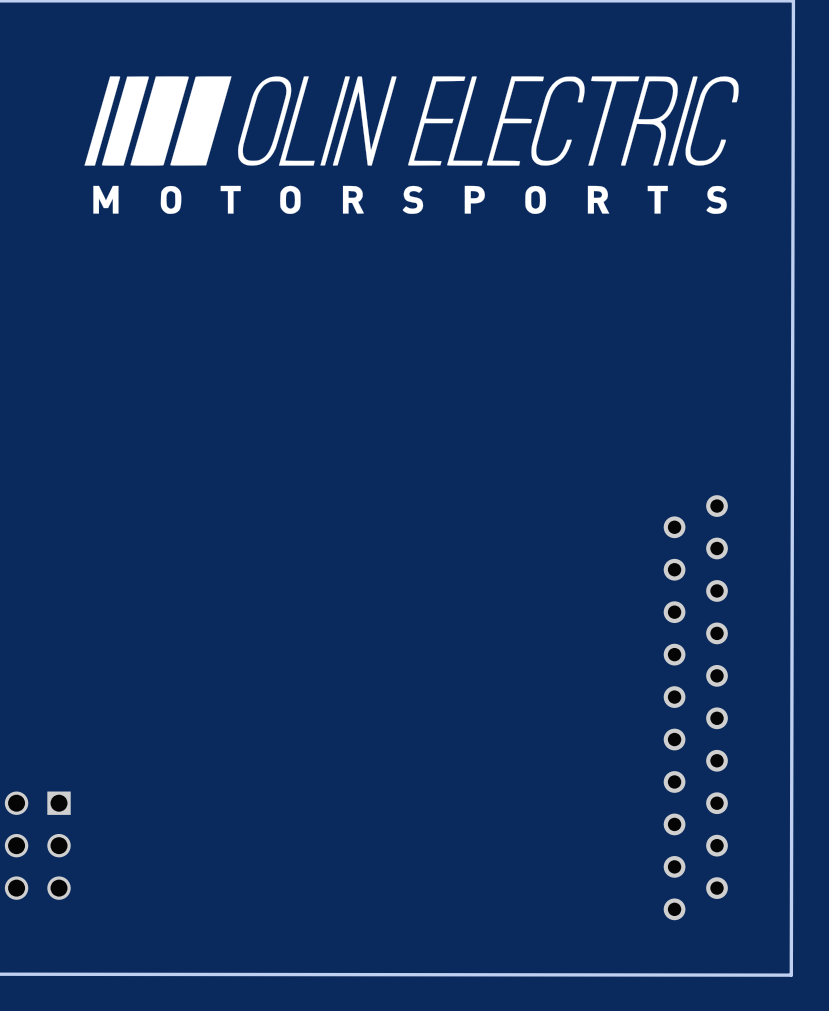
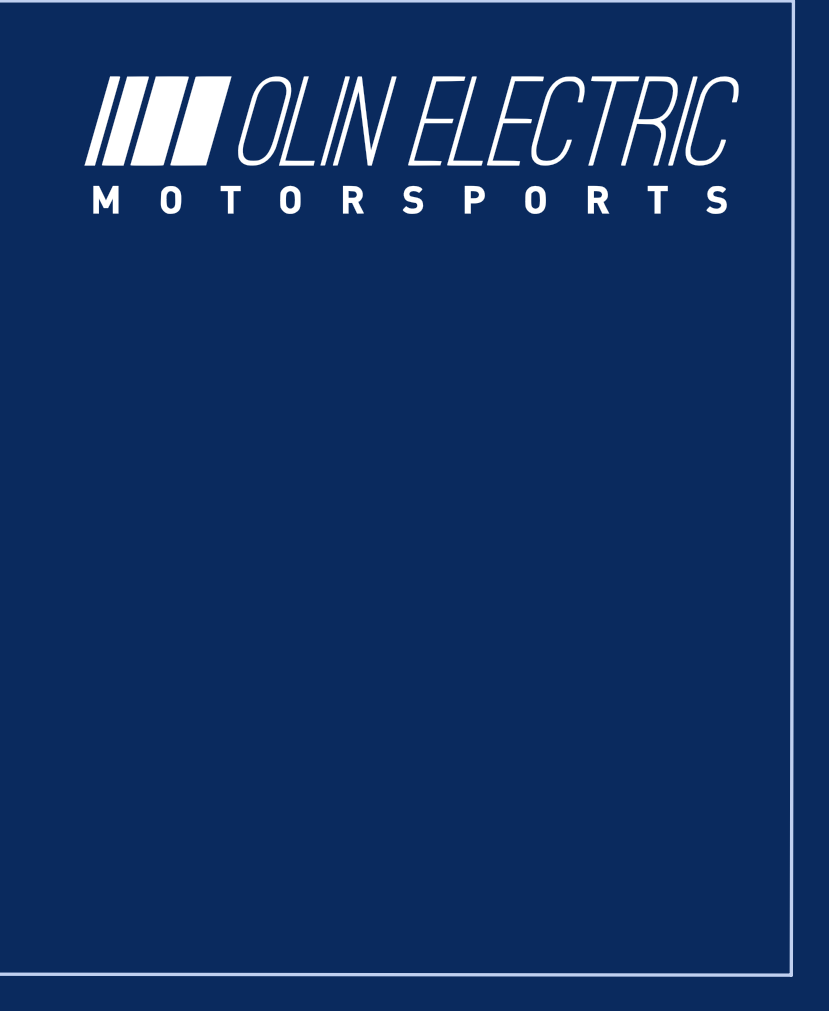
part: (695, 707) -> none
part: (37, 845) -> none

